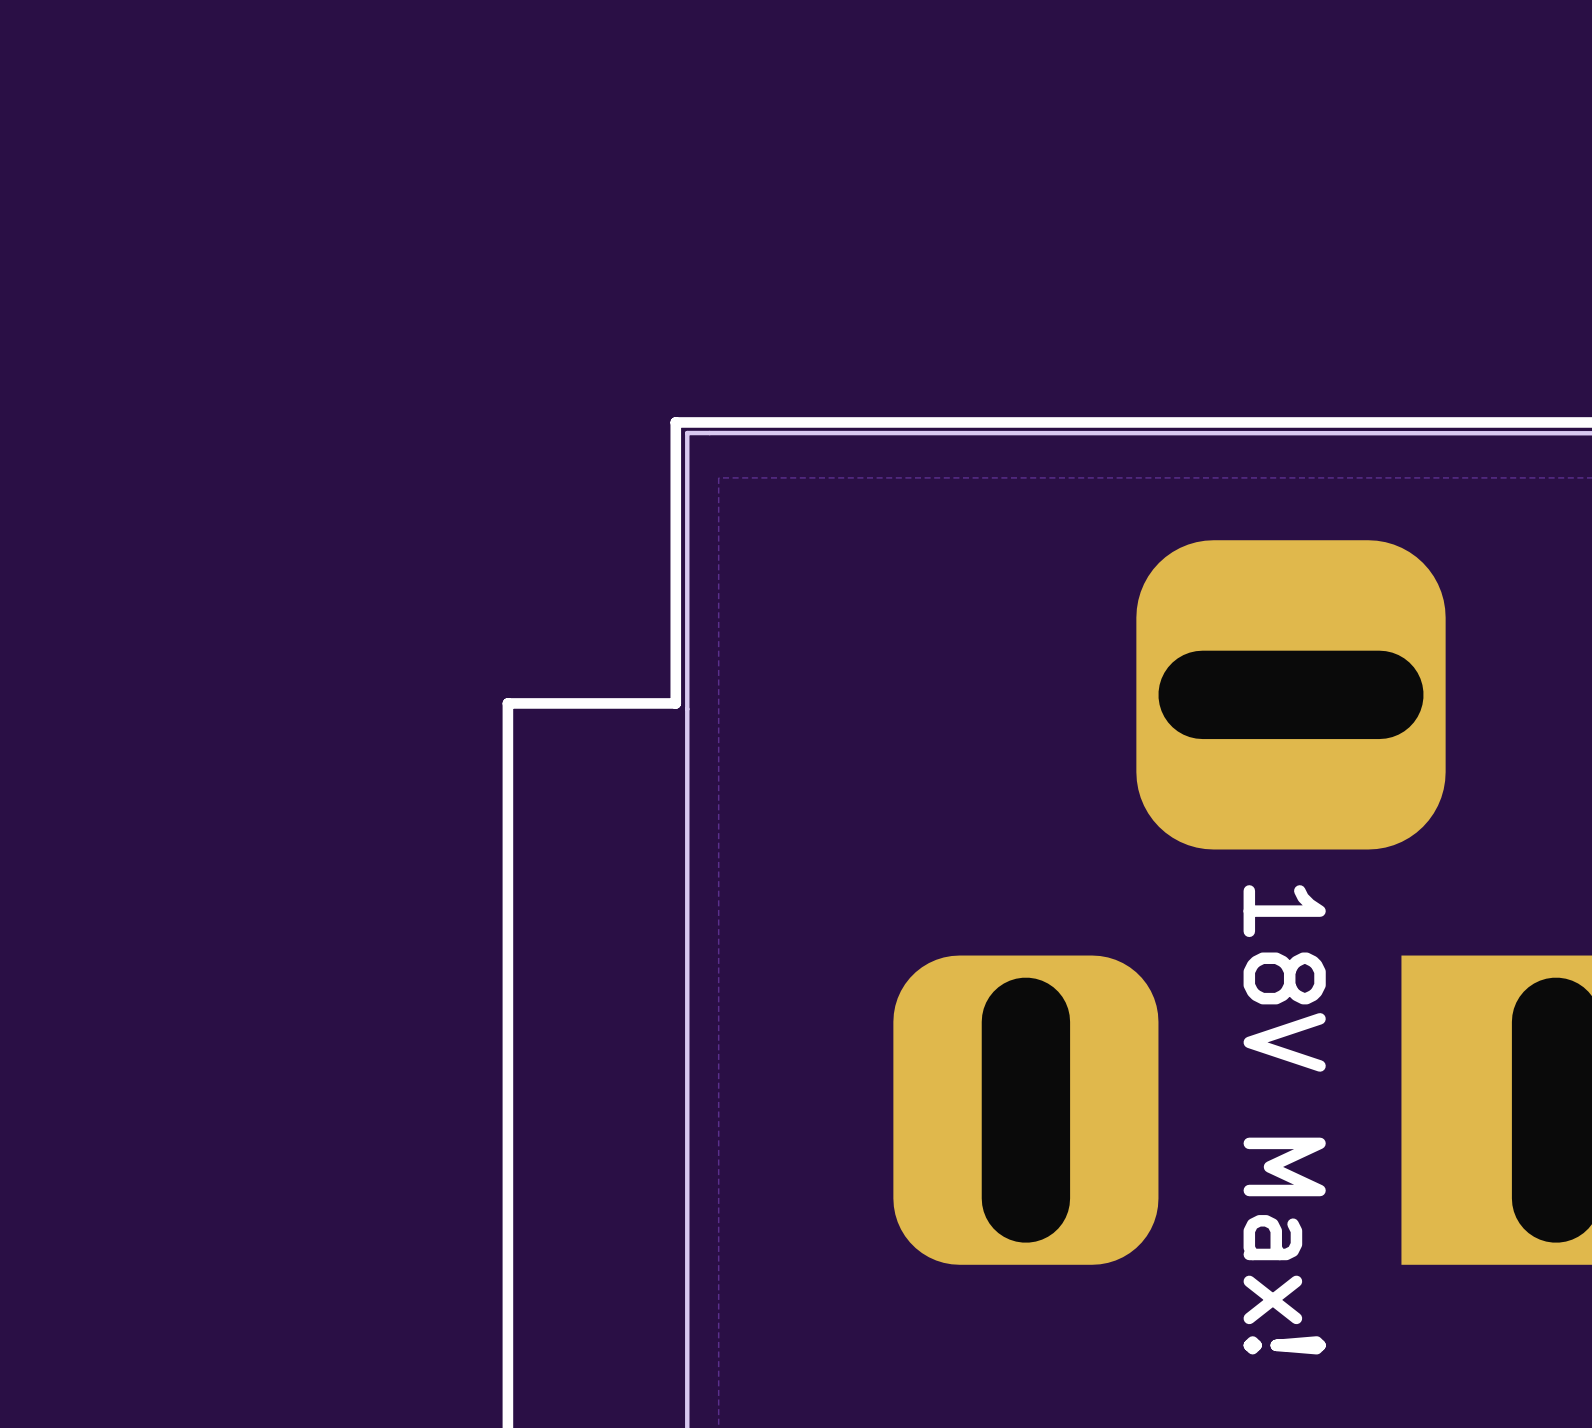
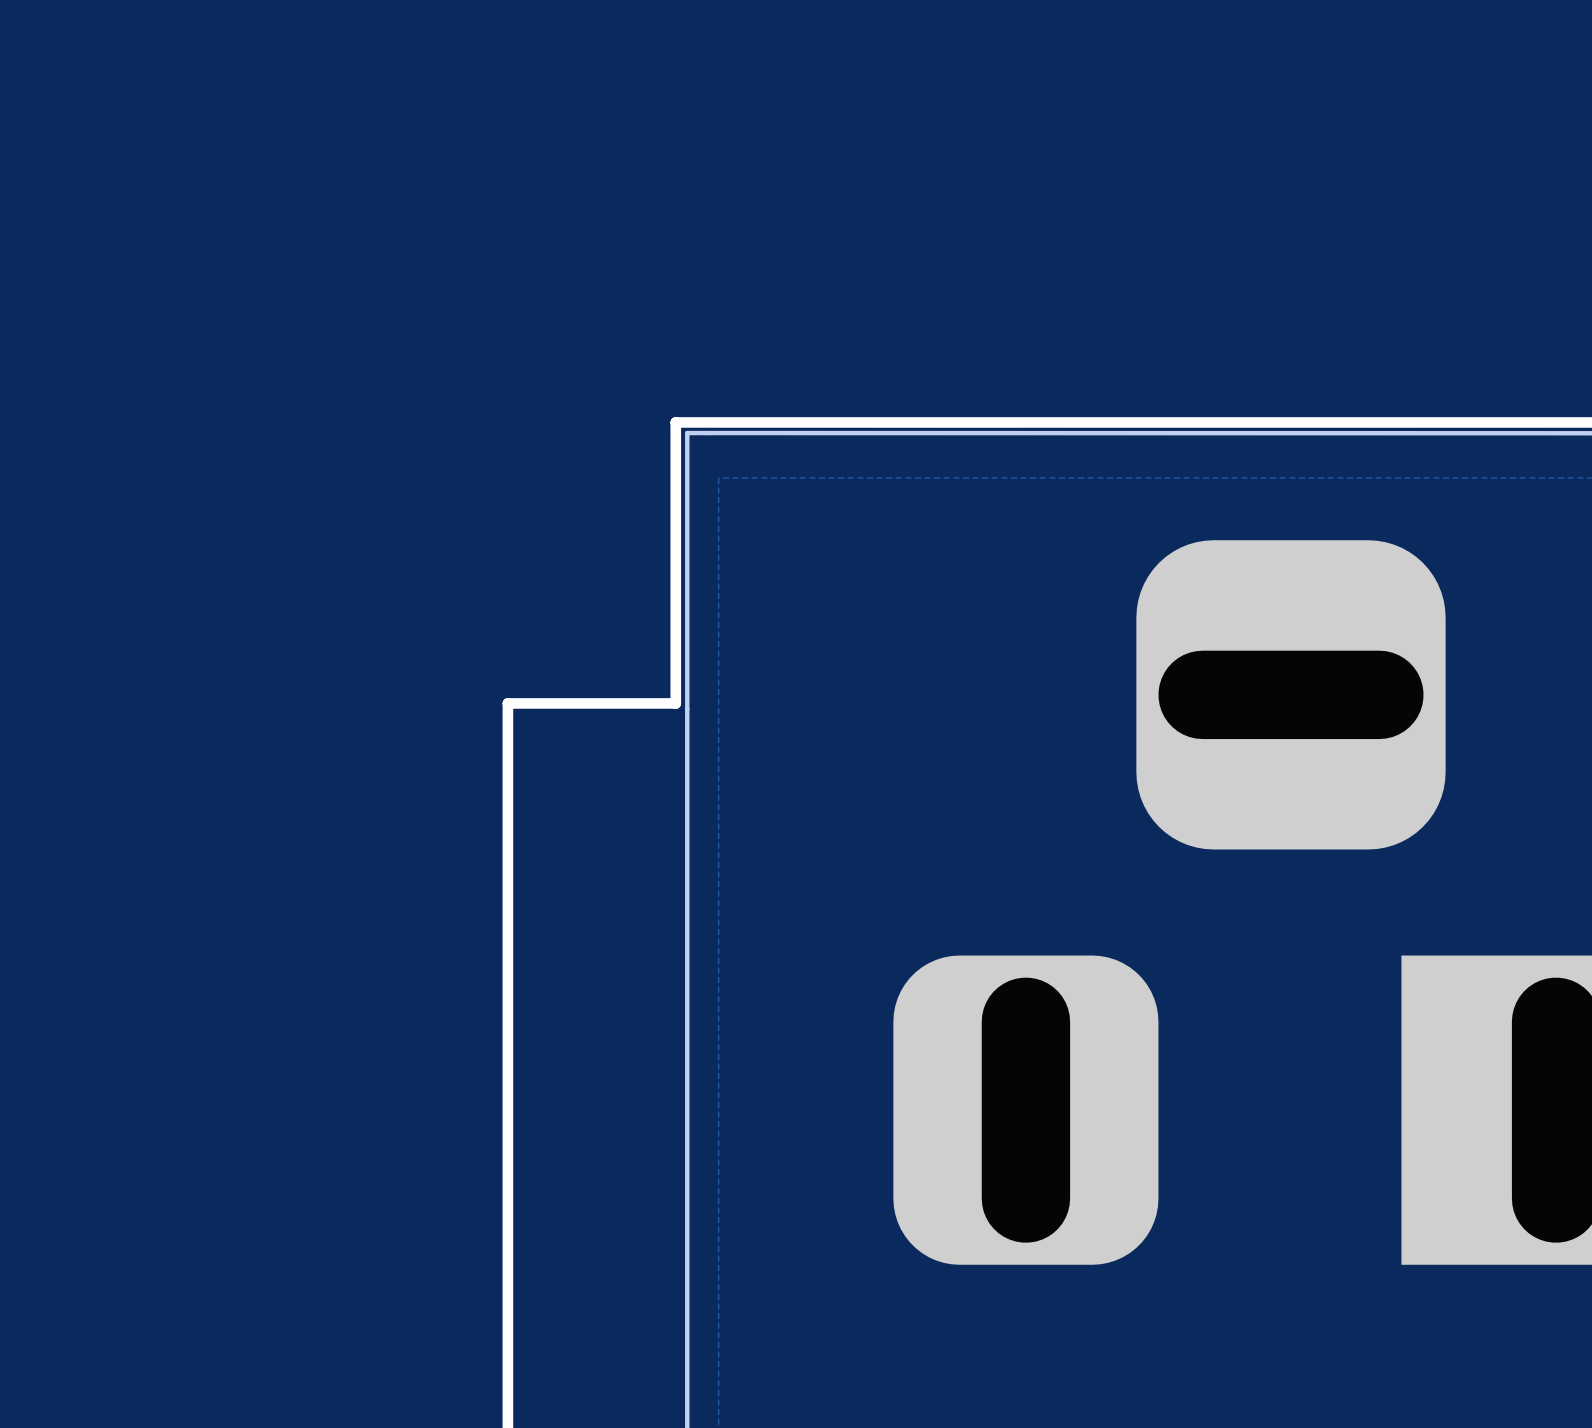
text: 18V Max! (1284, 1119) -> none

